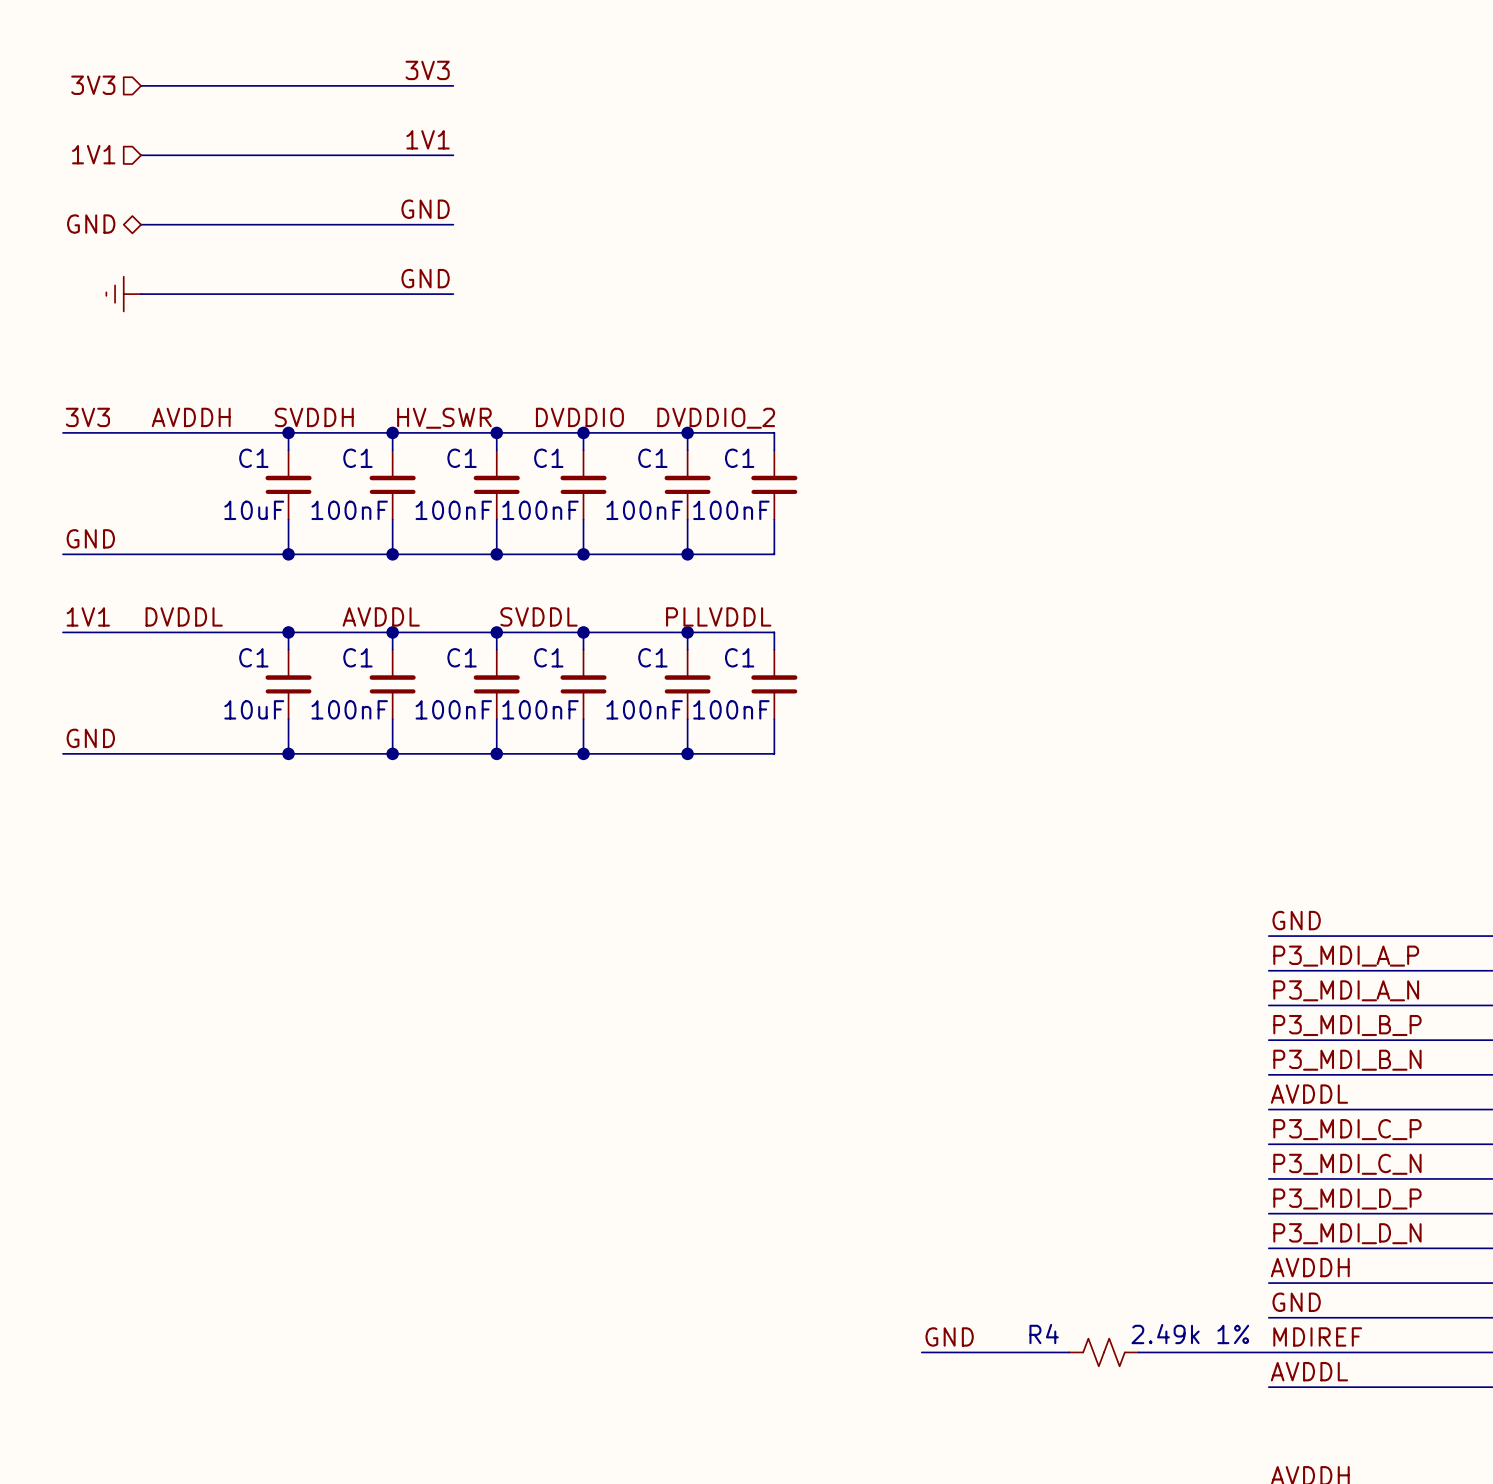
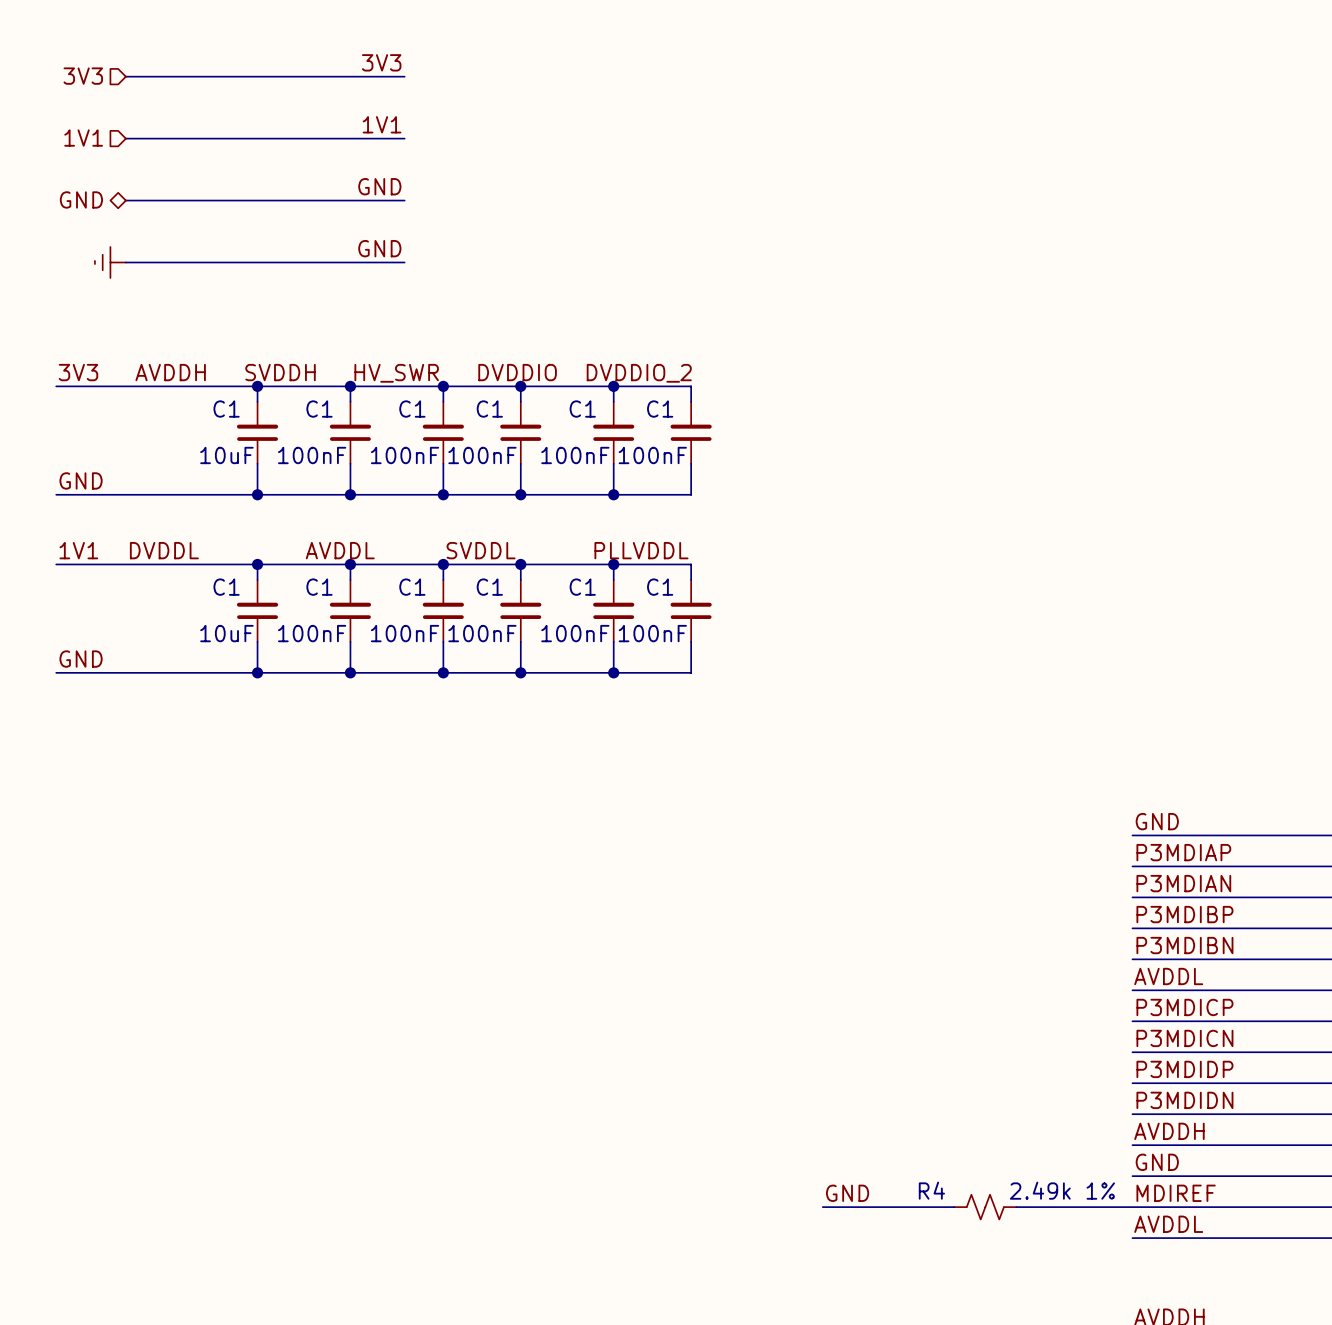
label: P3_MDI_A_P (1346, 956) -> P3MDIAP (1183, 852)
label: P3_MDI_A_N (1346, 990) -> P3MDIAN (1183, 883)
label: P3_MDI_B_P (1347, 1025) -> P3MDIBP (1184, 914)
label: P3_MDI_B_N (1347, 1060) -> P3MDIBN (1184, 945)
label: P3_MDI_C_P (1347, 1129) -> P3MDICP (1184, 1007)
label: P3_MDI_C_N (1347, 1164) -> P3MDICN (1184, 1038)
label: P3_MDI_D_P (1347, 1199) -> P3MDIDP (1184, 1069)
label: P3_MDI_D_N (1347, 1233) -> P3MDIDN (1184, 1100)

